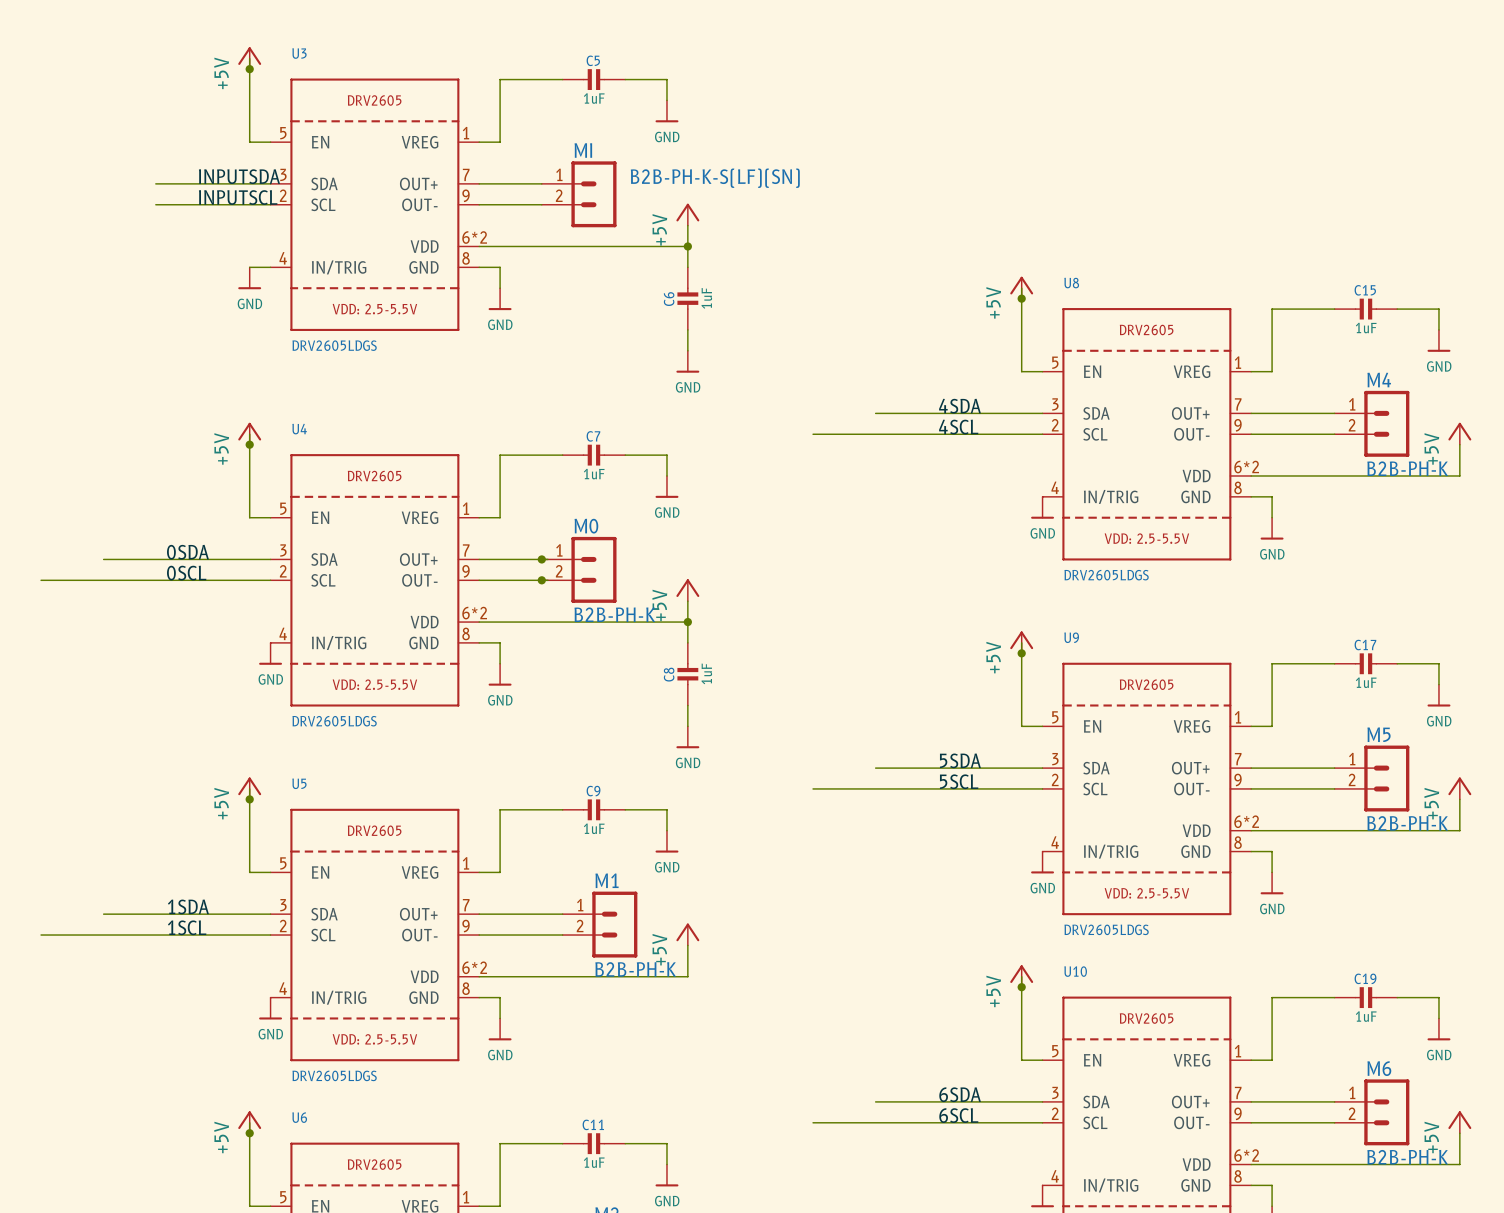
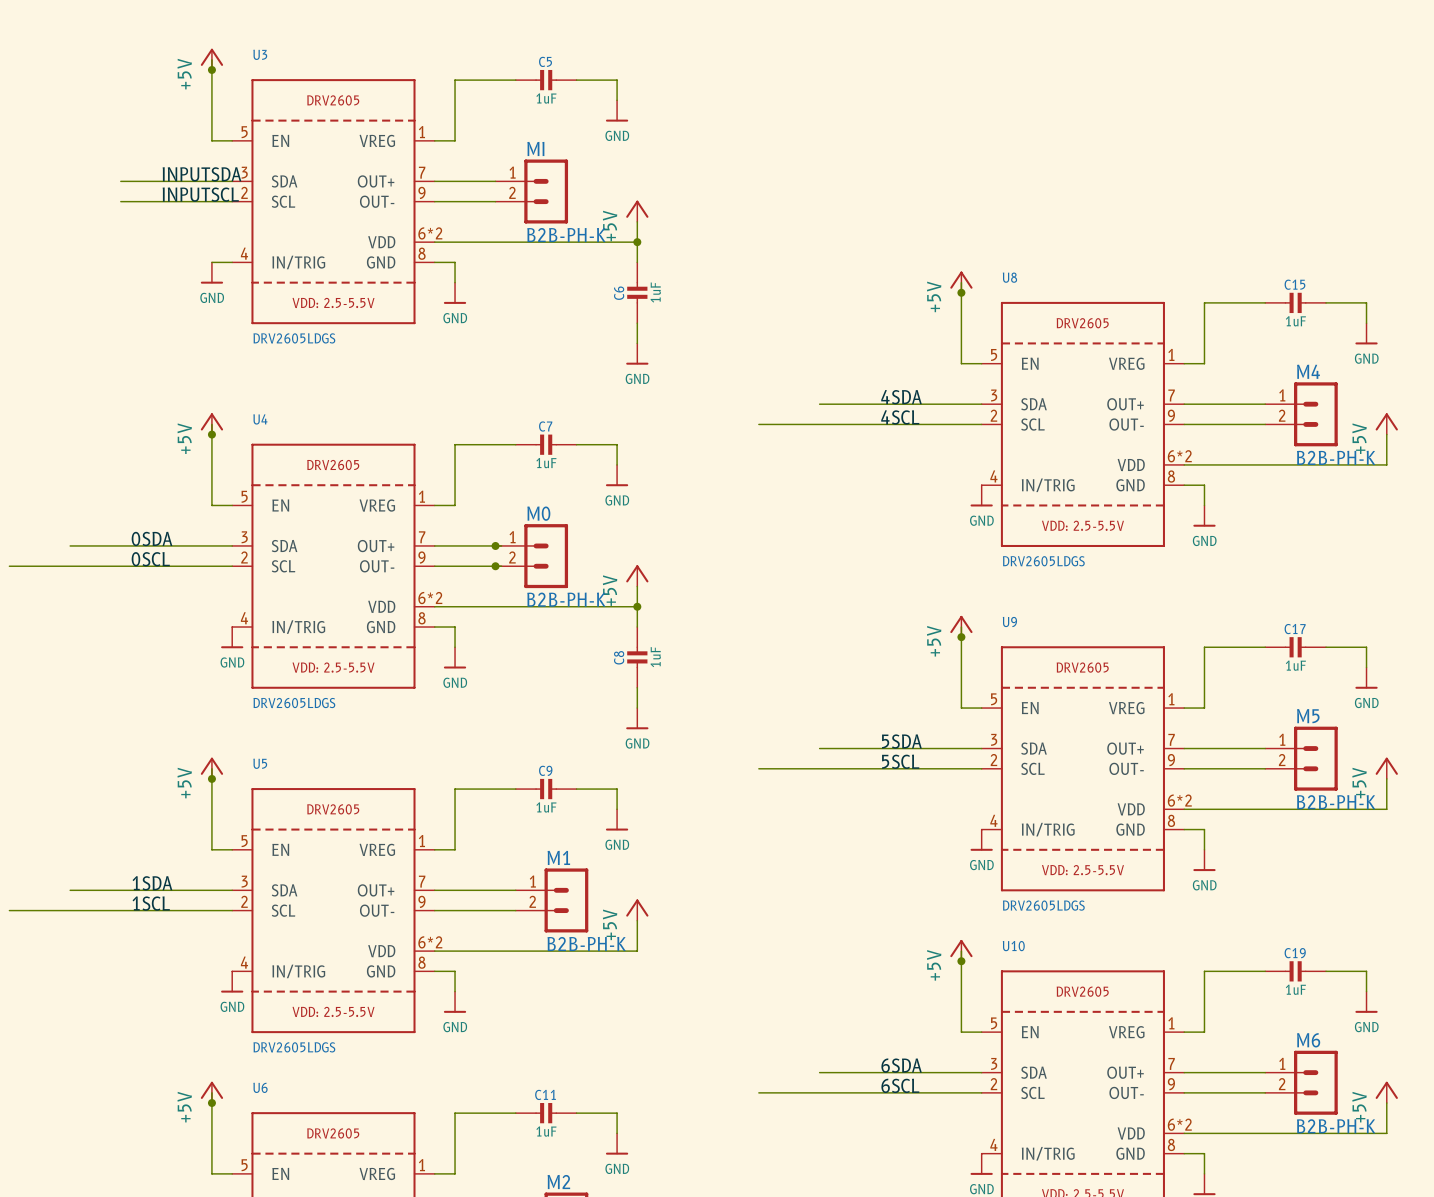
MI value: B2B-PH-K-S(LF)(SN) (715, 178) -> B2B-PH-K (566, 235)

